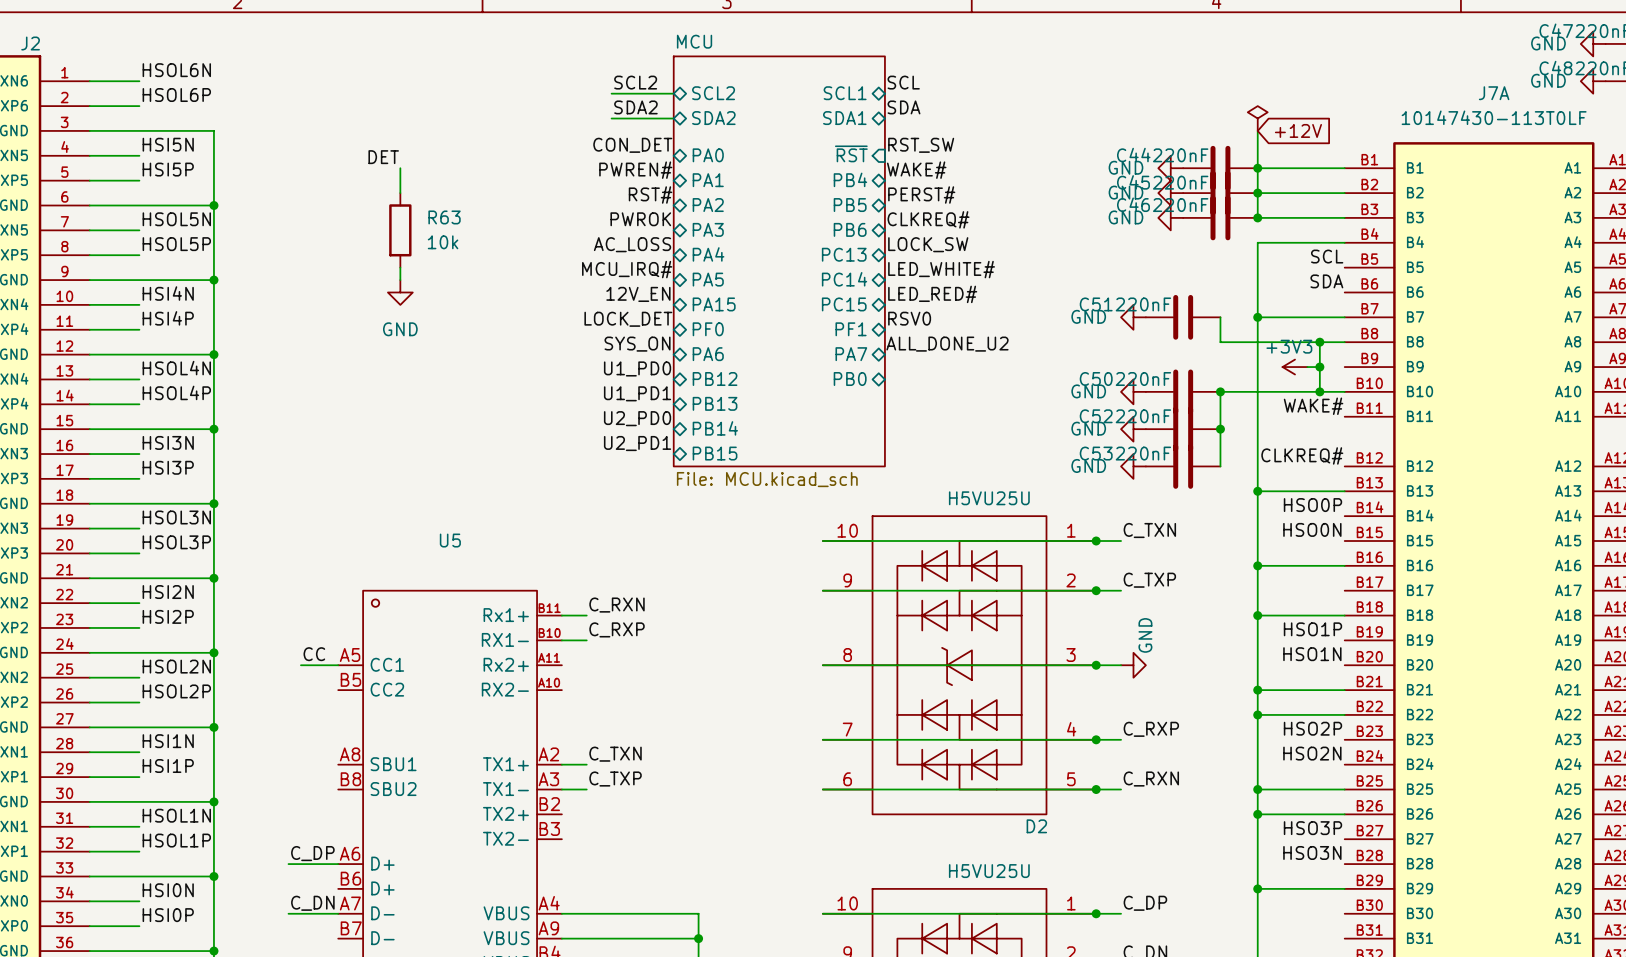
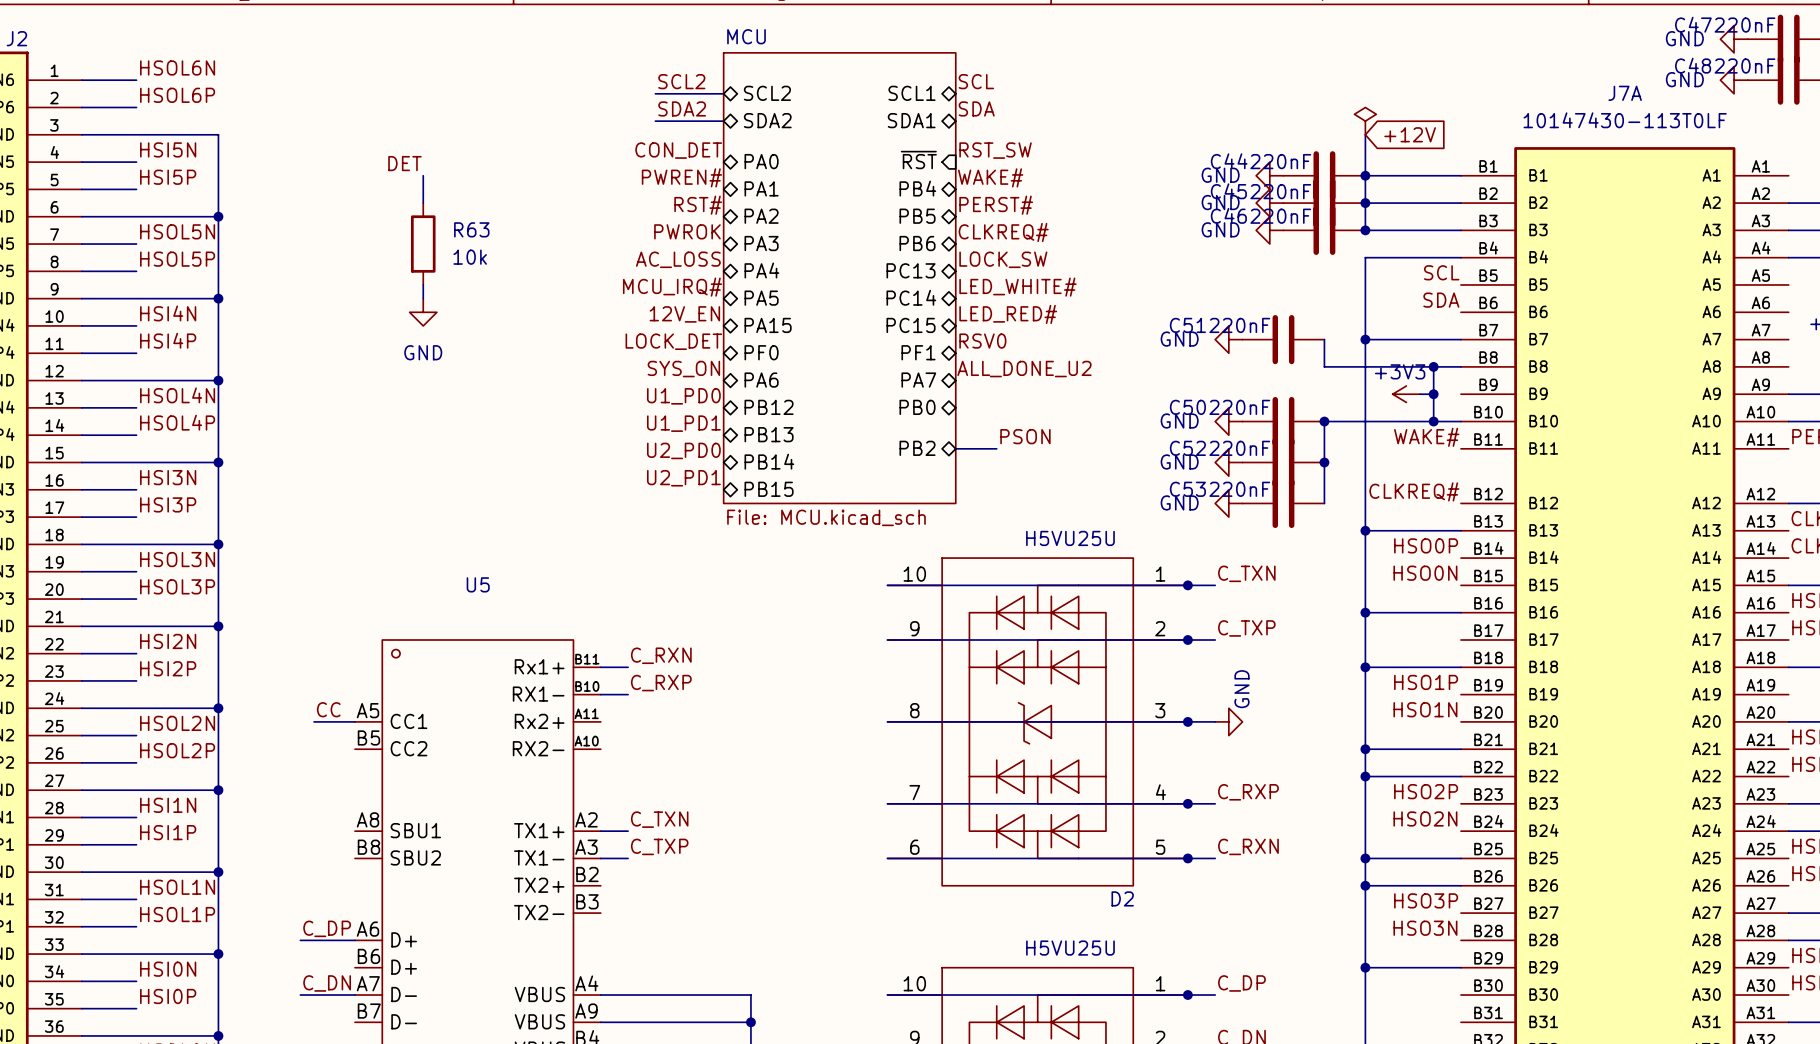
label: none -> PSON (1025, 436)
sheet pin: none -> PB2 (917, 448)
wire: none -> (955, 448) (996, 448)

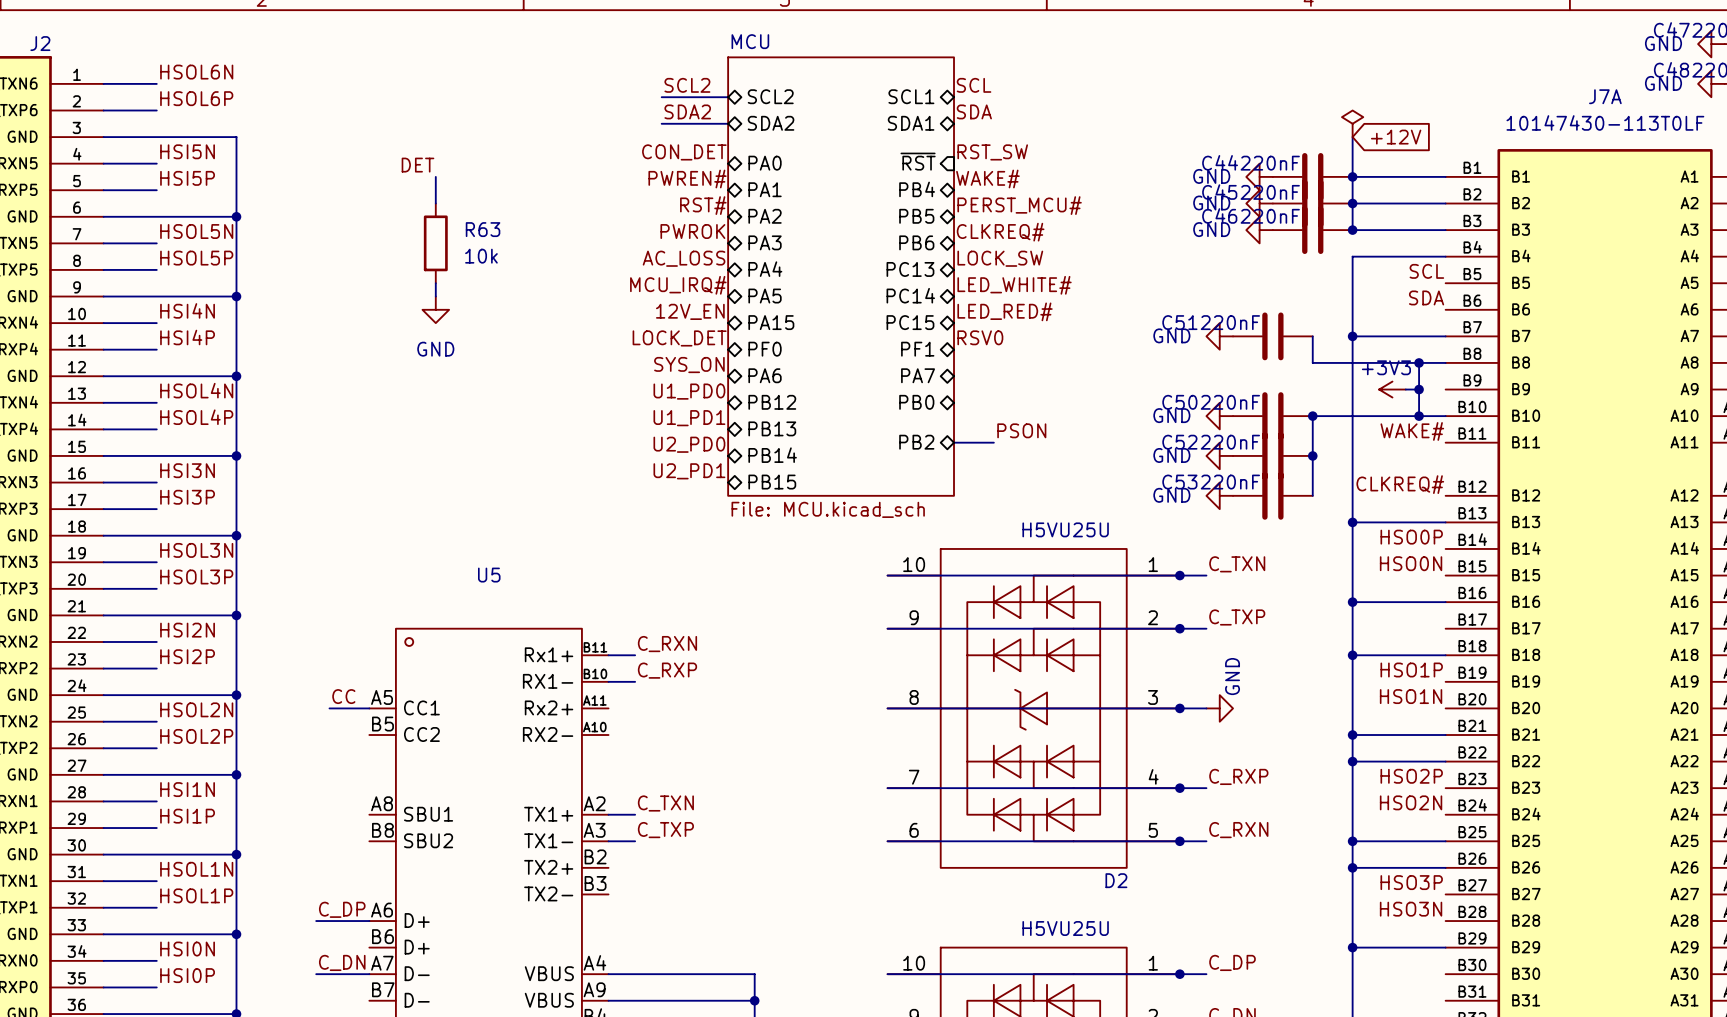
label: PERST# (996, 205) -> PERST_MCU# (1019, 205)
label: ALL_DONE_U2 (1024, 369) -> none

